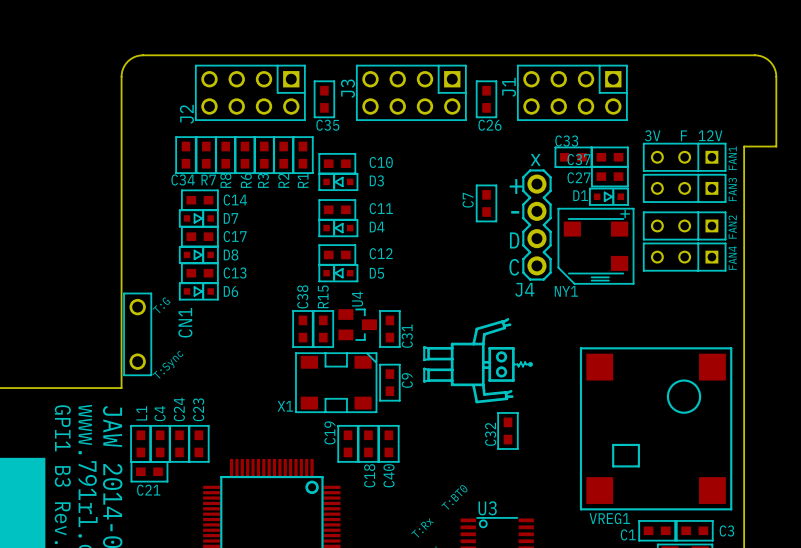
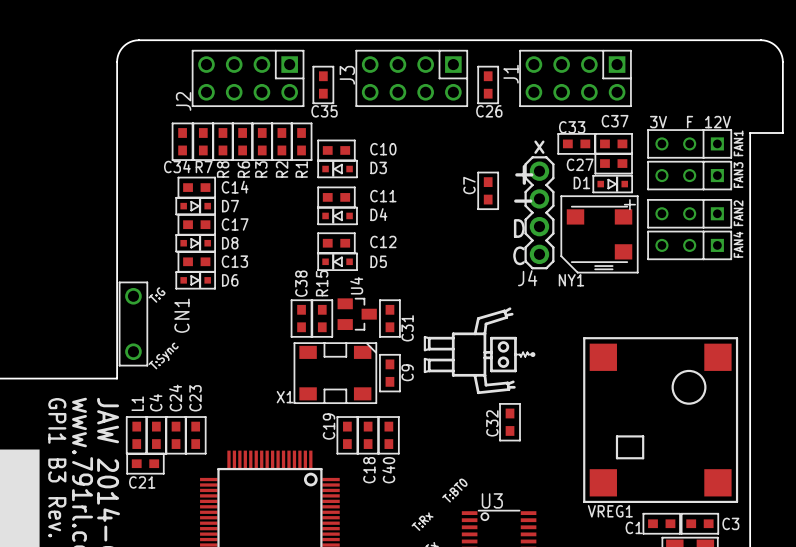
C37 name position: C37 (579, 159) -> C37 (615, 121)

